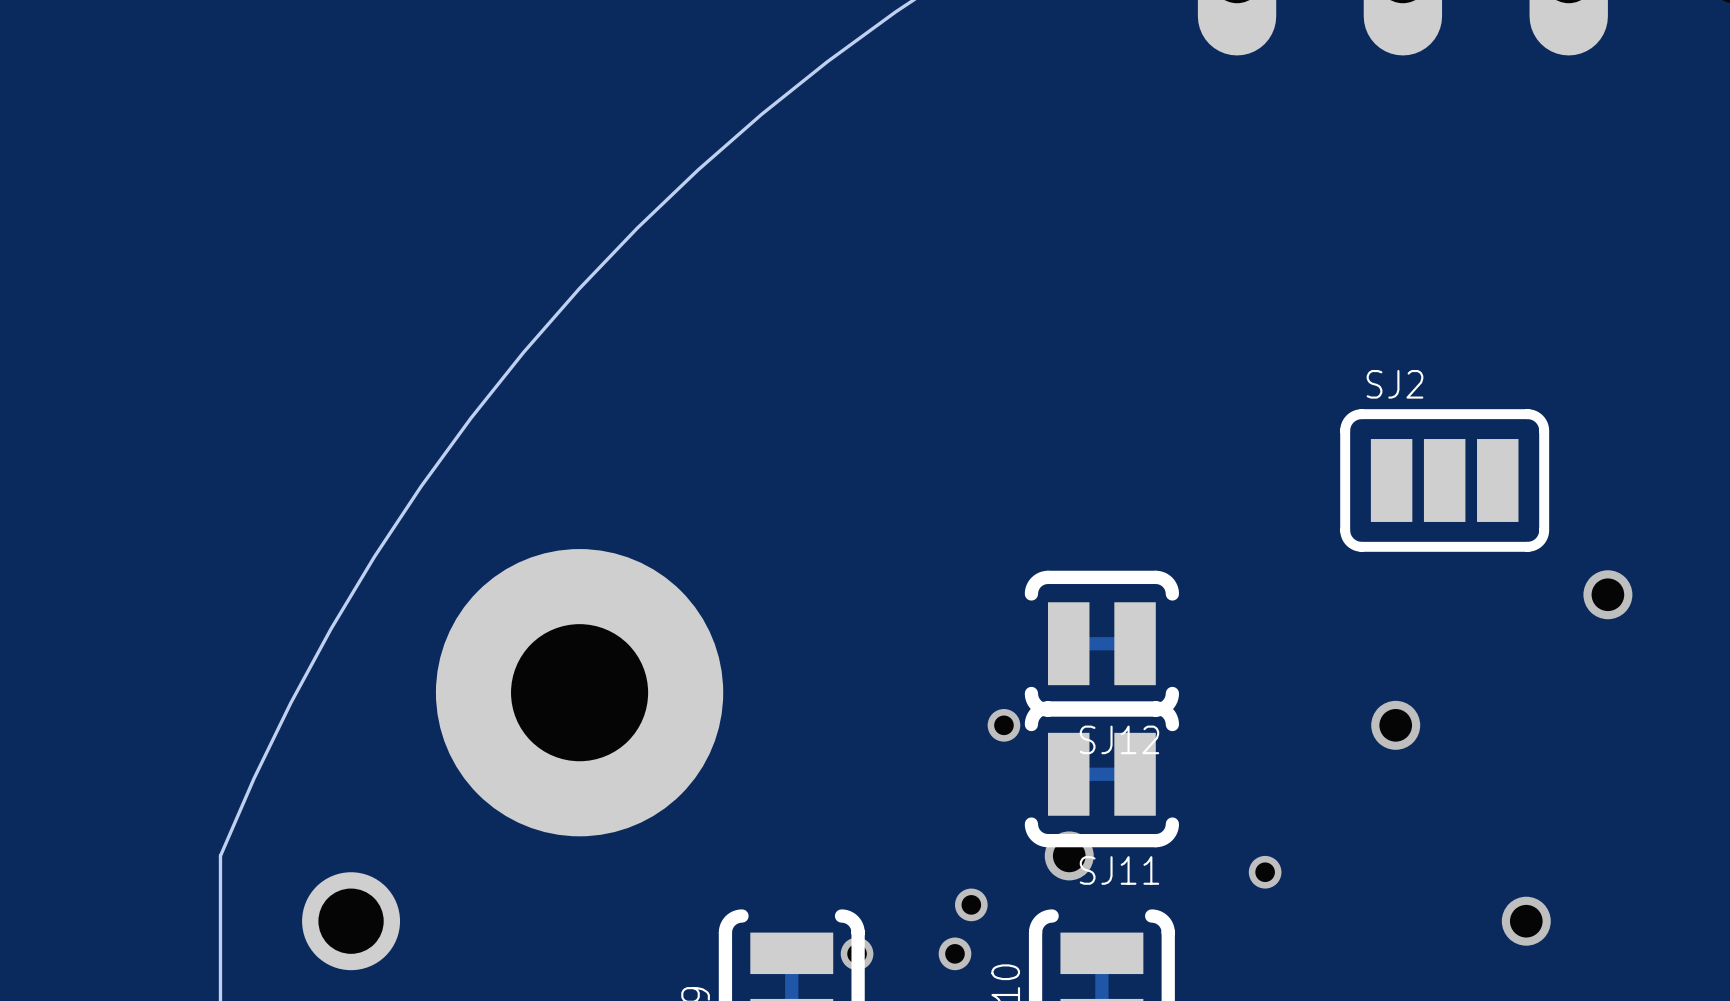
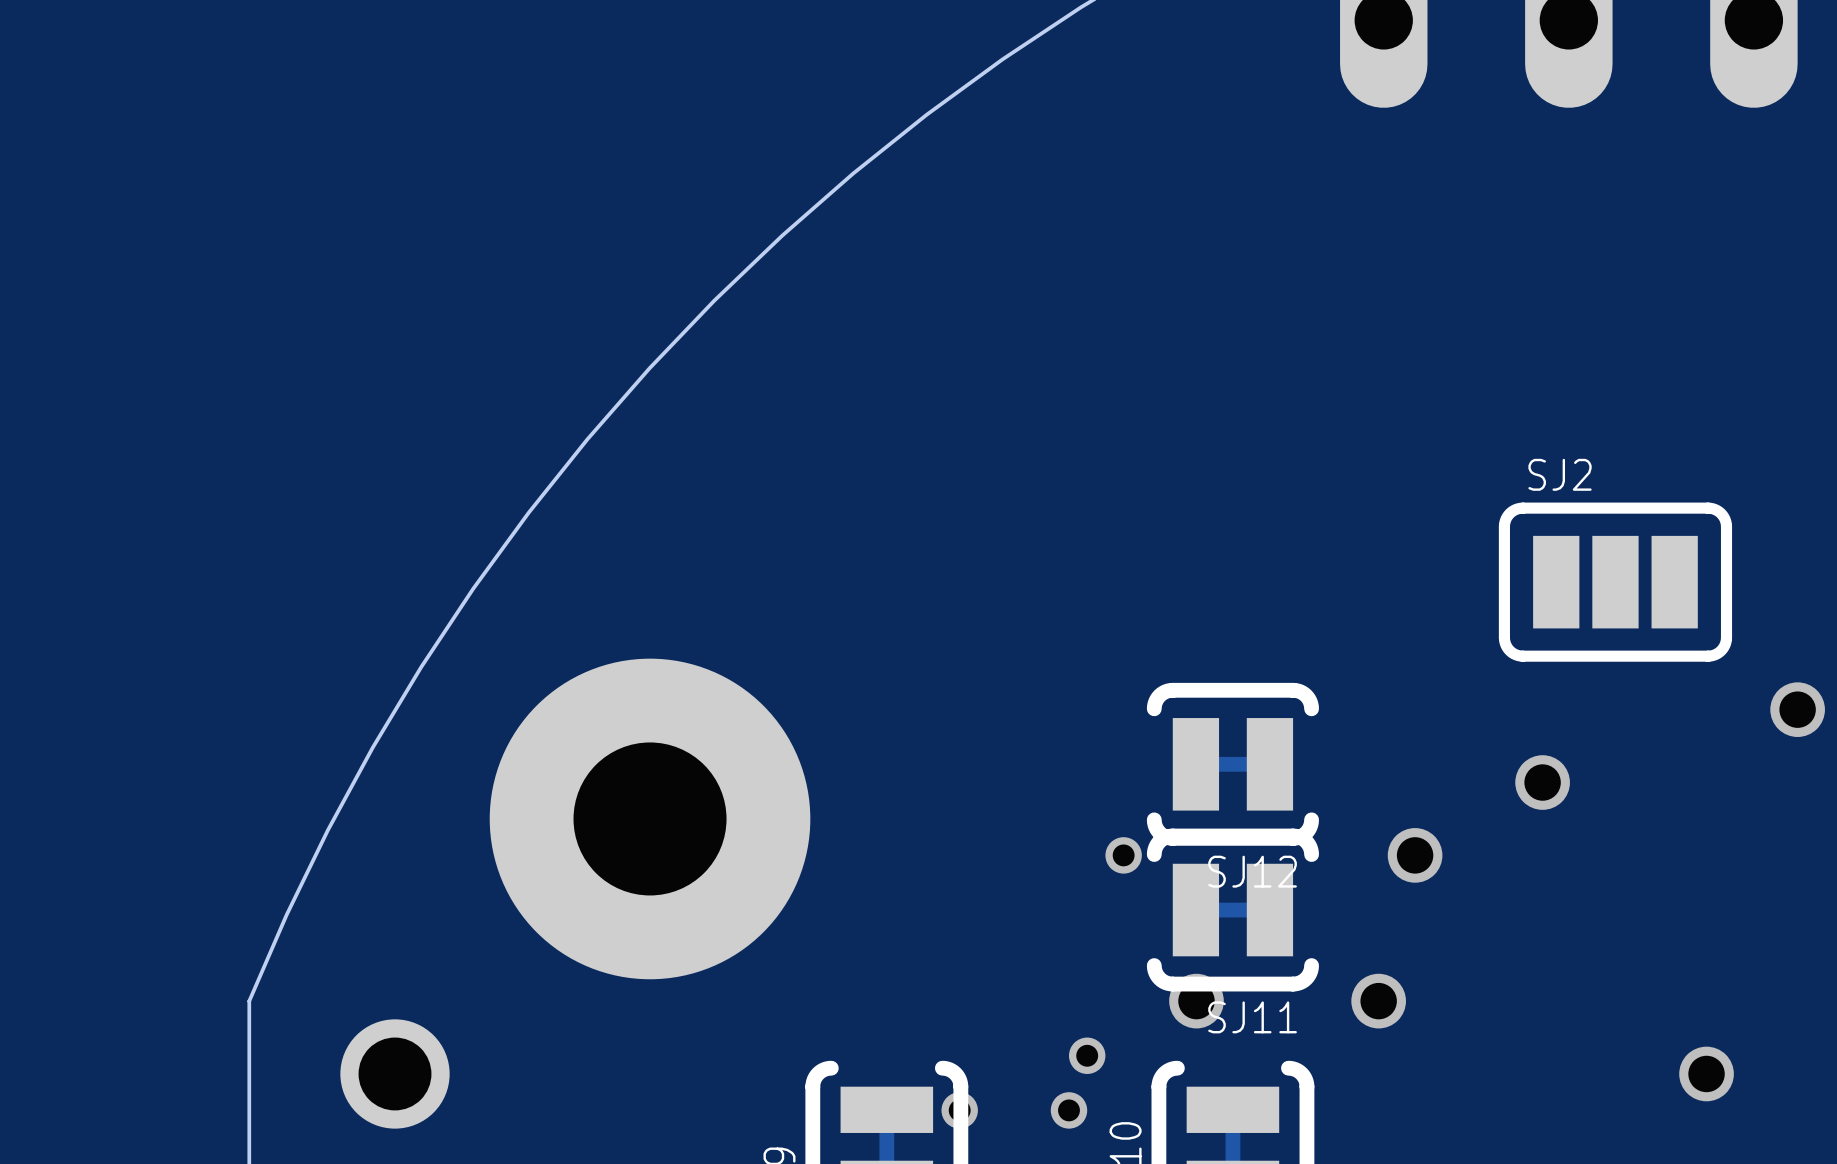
via: none -> (1542, 782)
via: none -> (1415, 855)
via: (1395, 725) -> none
via position: (1265, 872) -> (1378, 1001)

